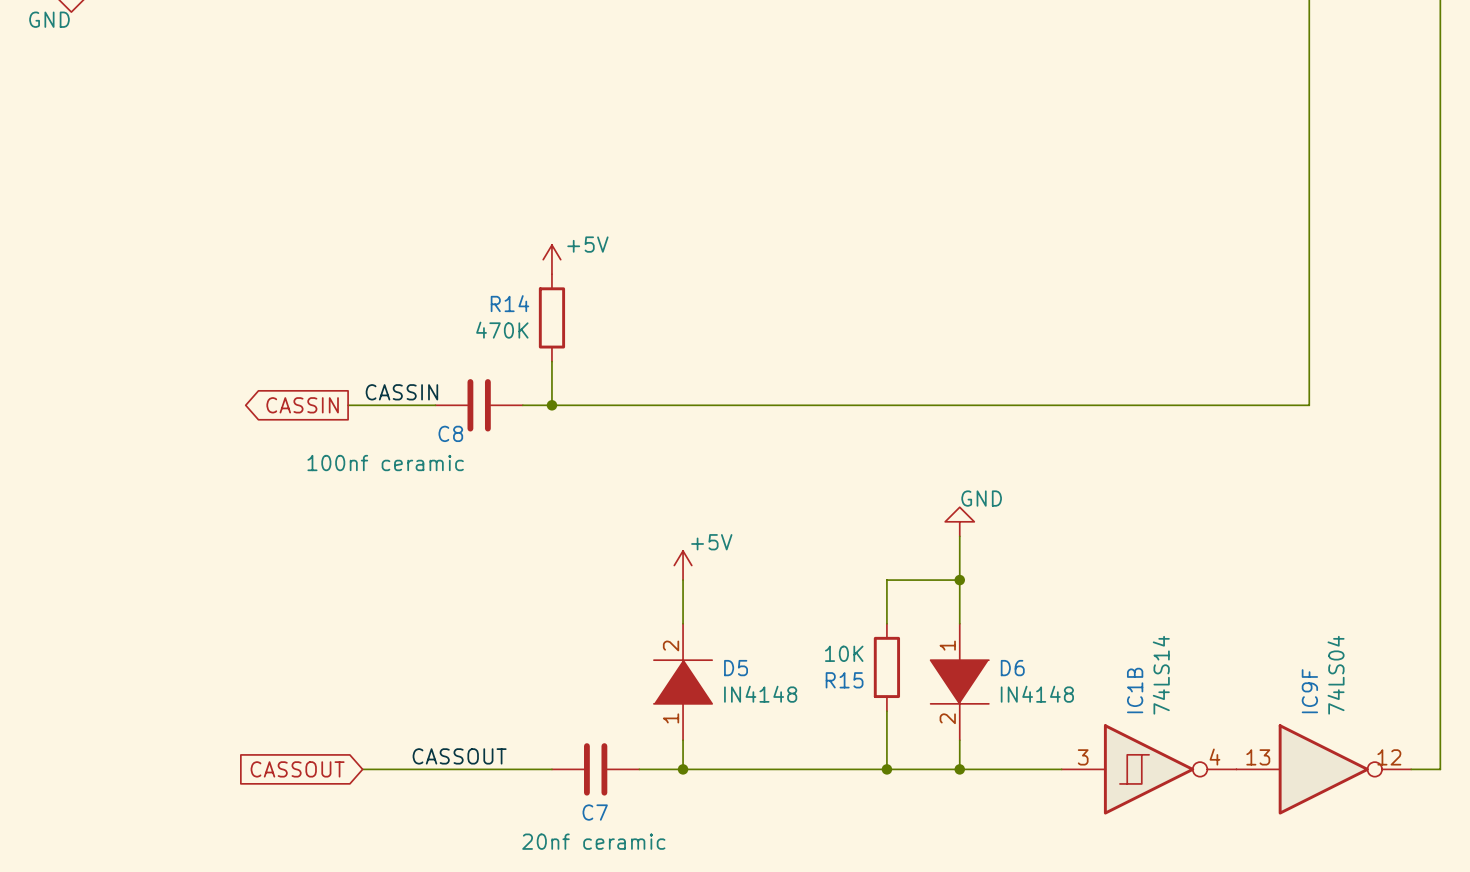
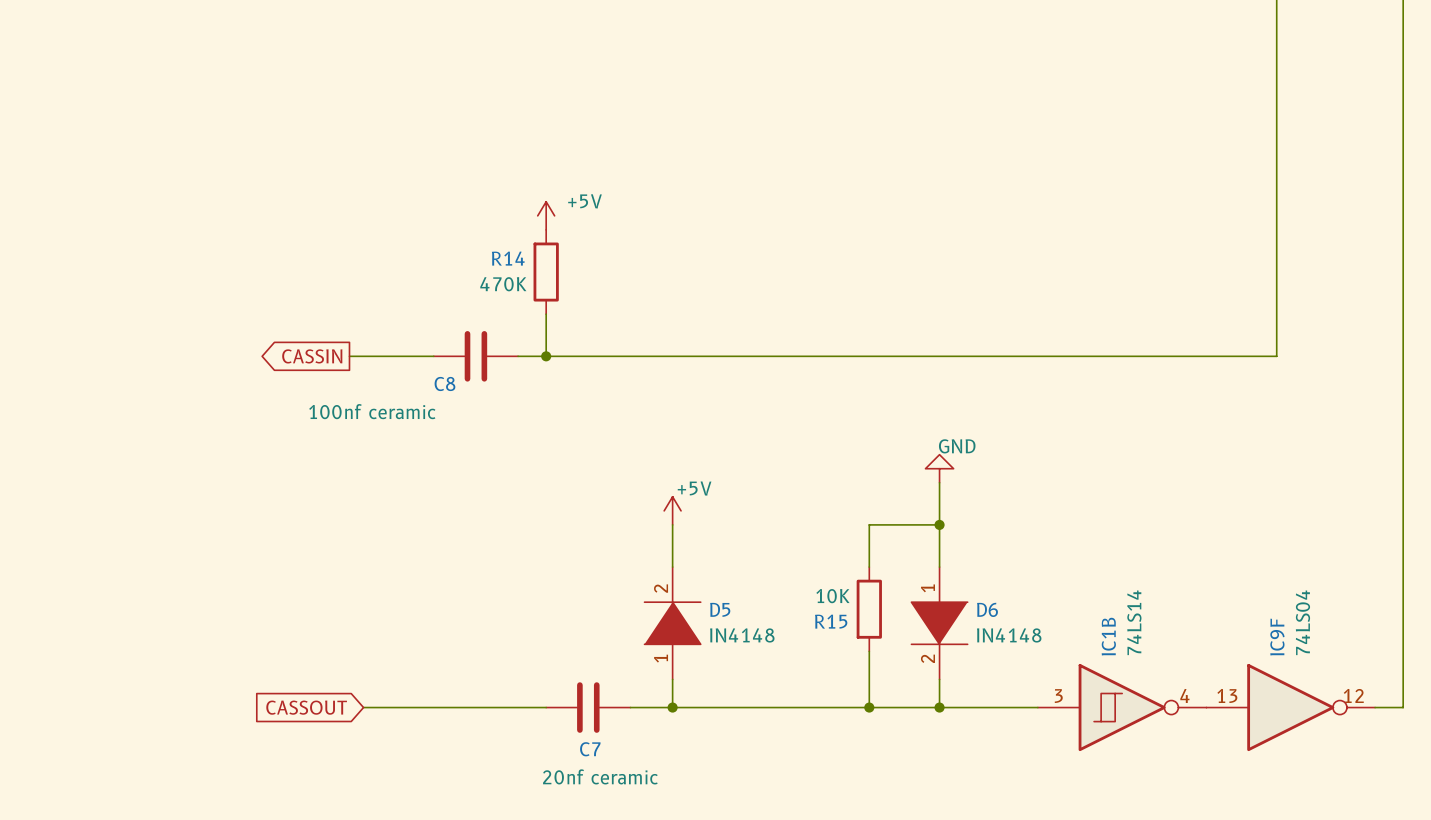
label: CASSIN (401, 392) -> none
label: CASSOUT (459, 756) -> none

